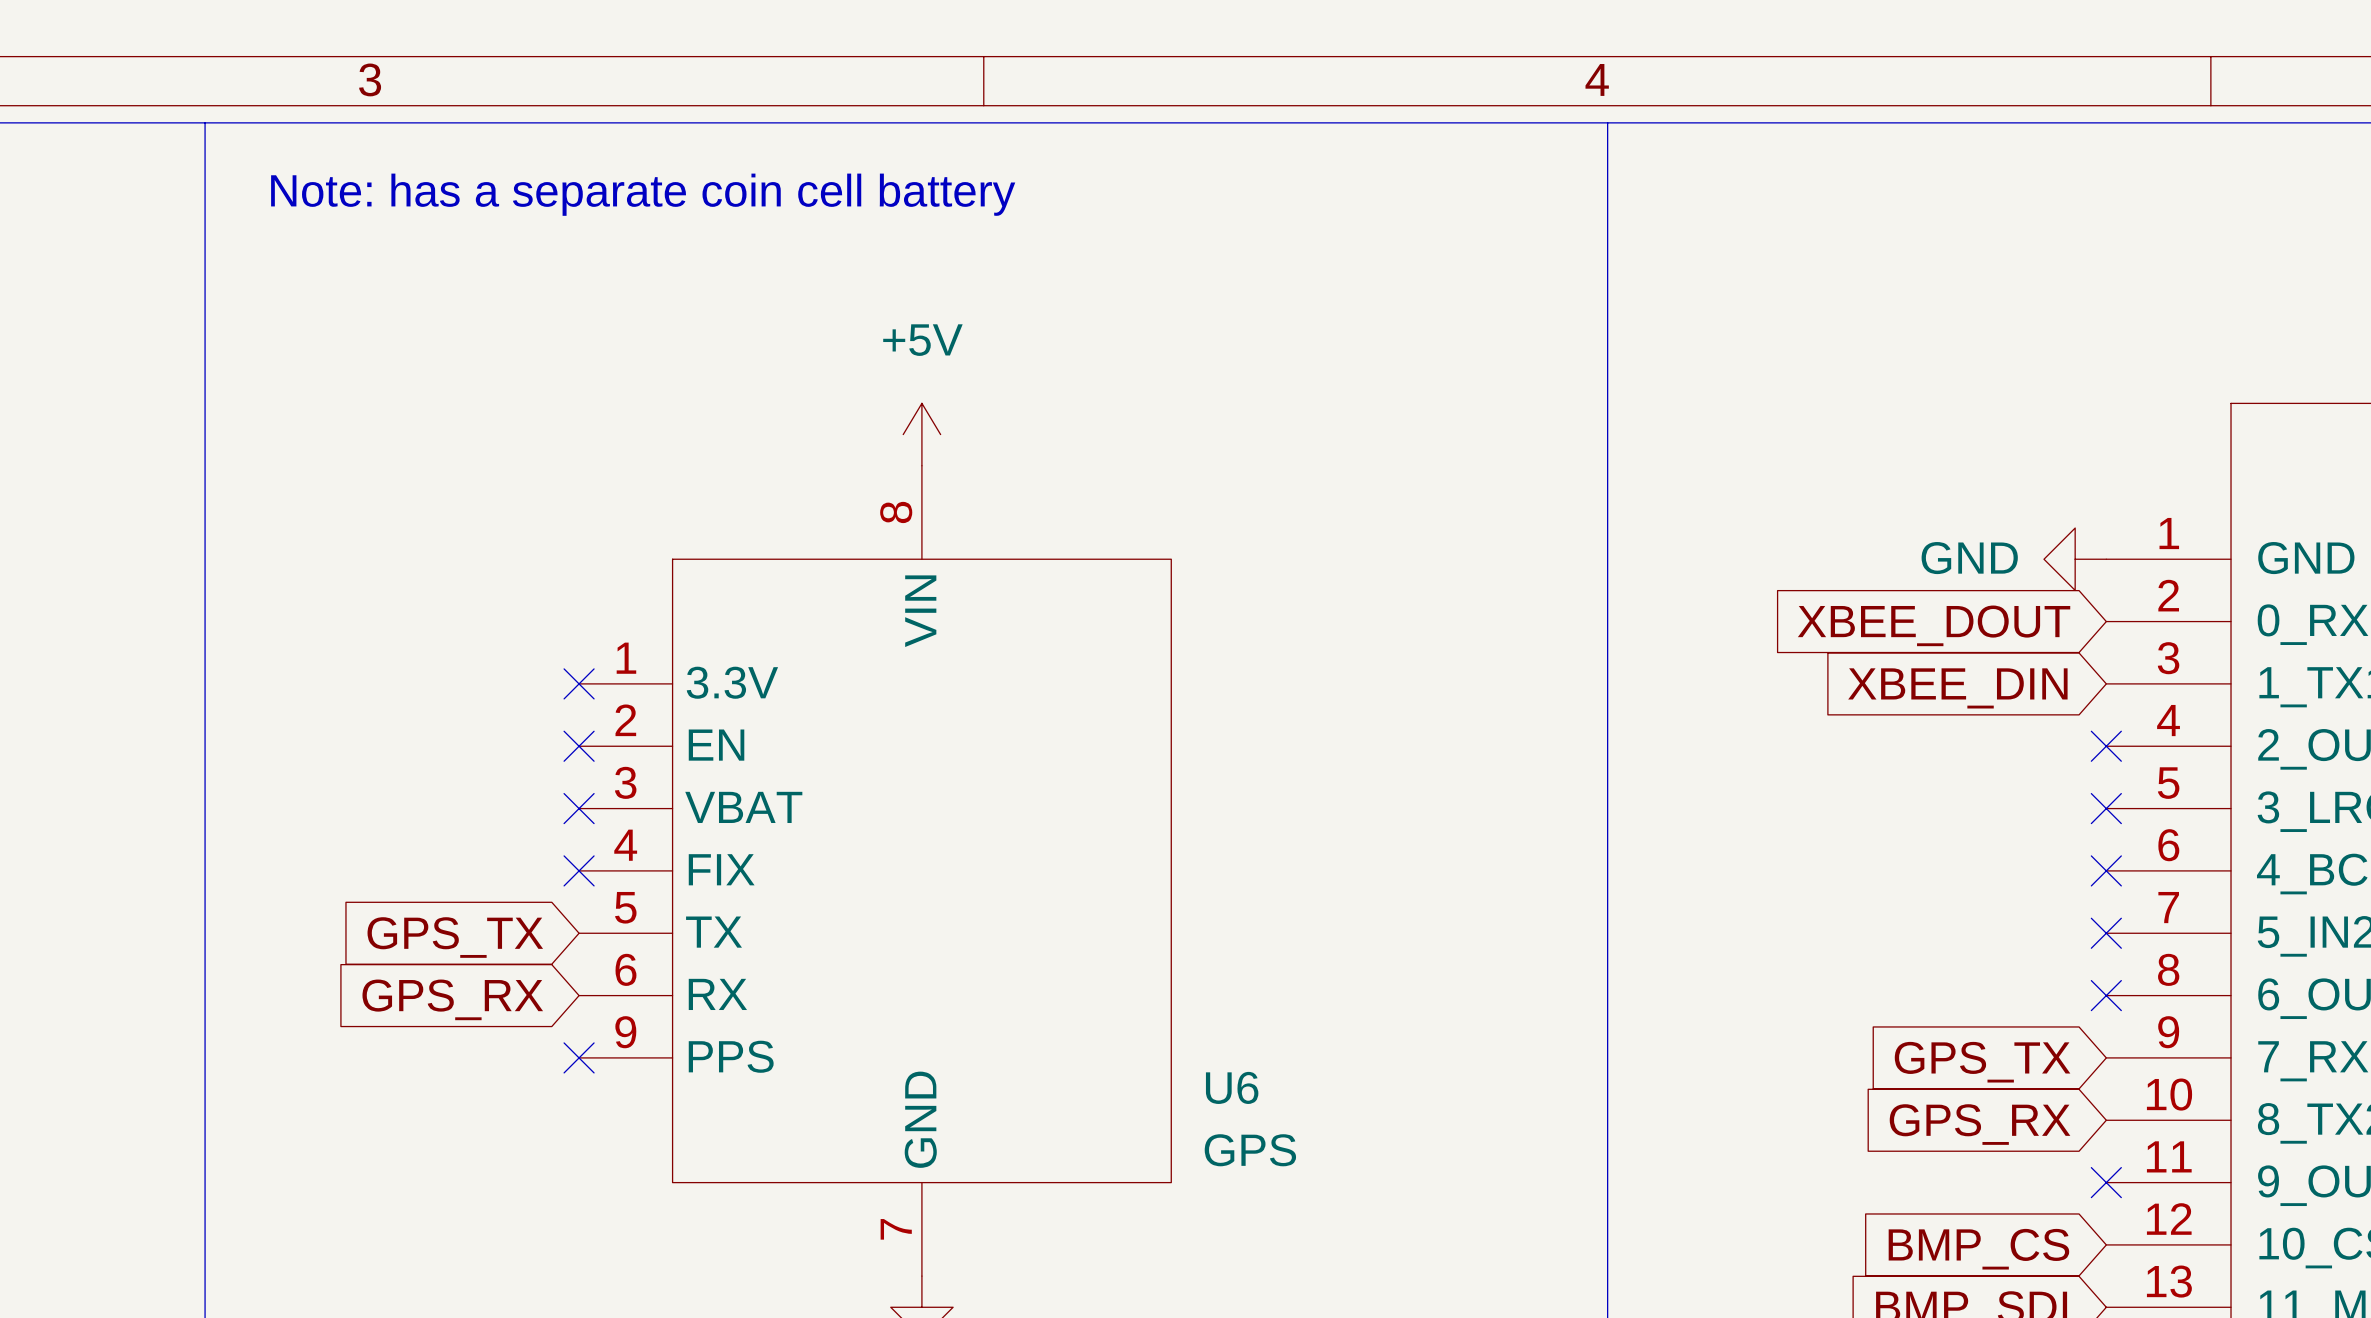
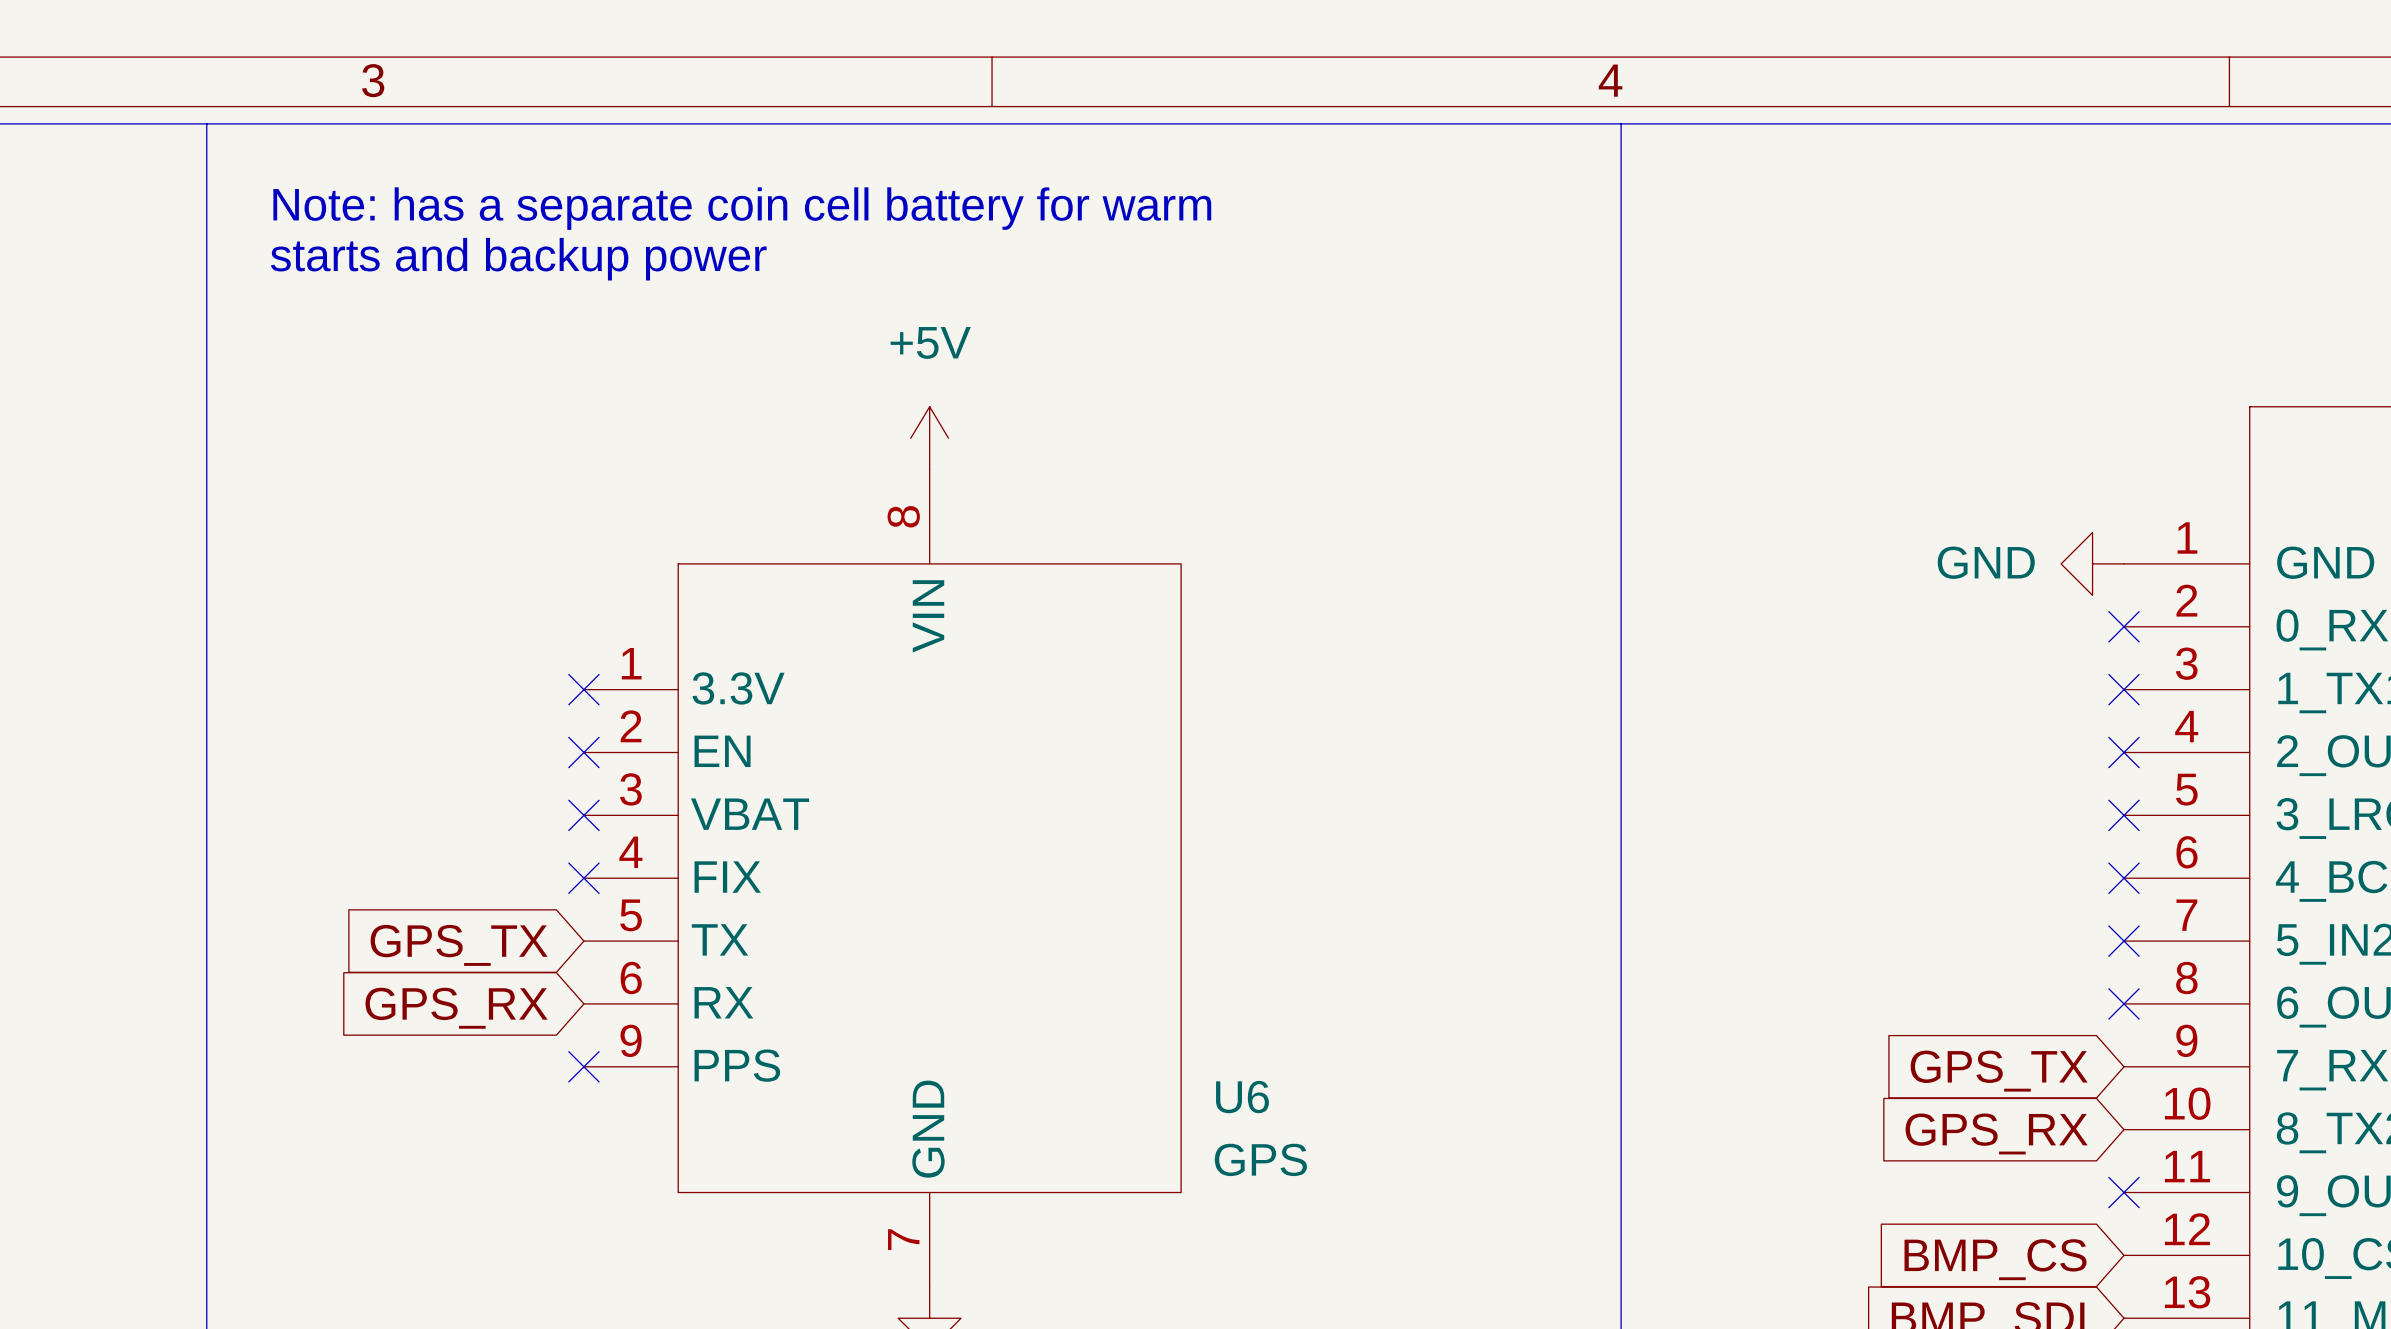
text: Note: has a separate coin cell battery (643, 194) -> Note: has a separate coin cell battery for warm (742, 208)
text: none -> starts and backup power (518, 259)
no-connect mark: none -> (2123, 626)
global label: XBEE_DOUT (1934, 625) -> none
no-connect mark: none -> (2123, 689)
global label: XBEE_DIN (1957, 688) -> none

